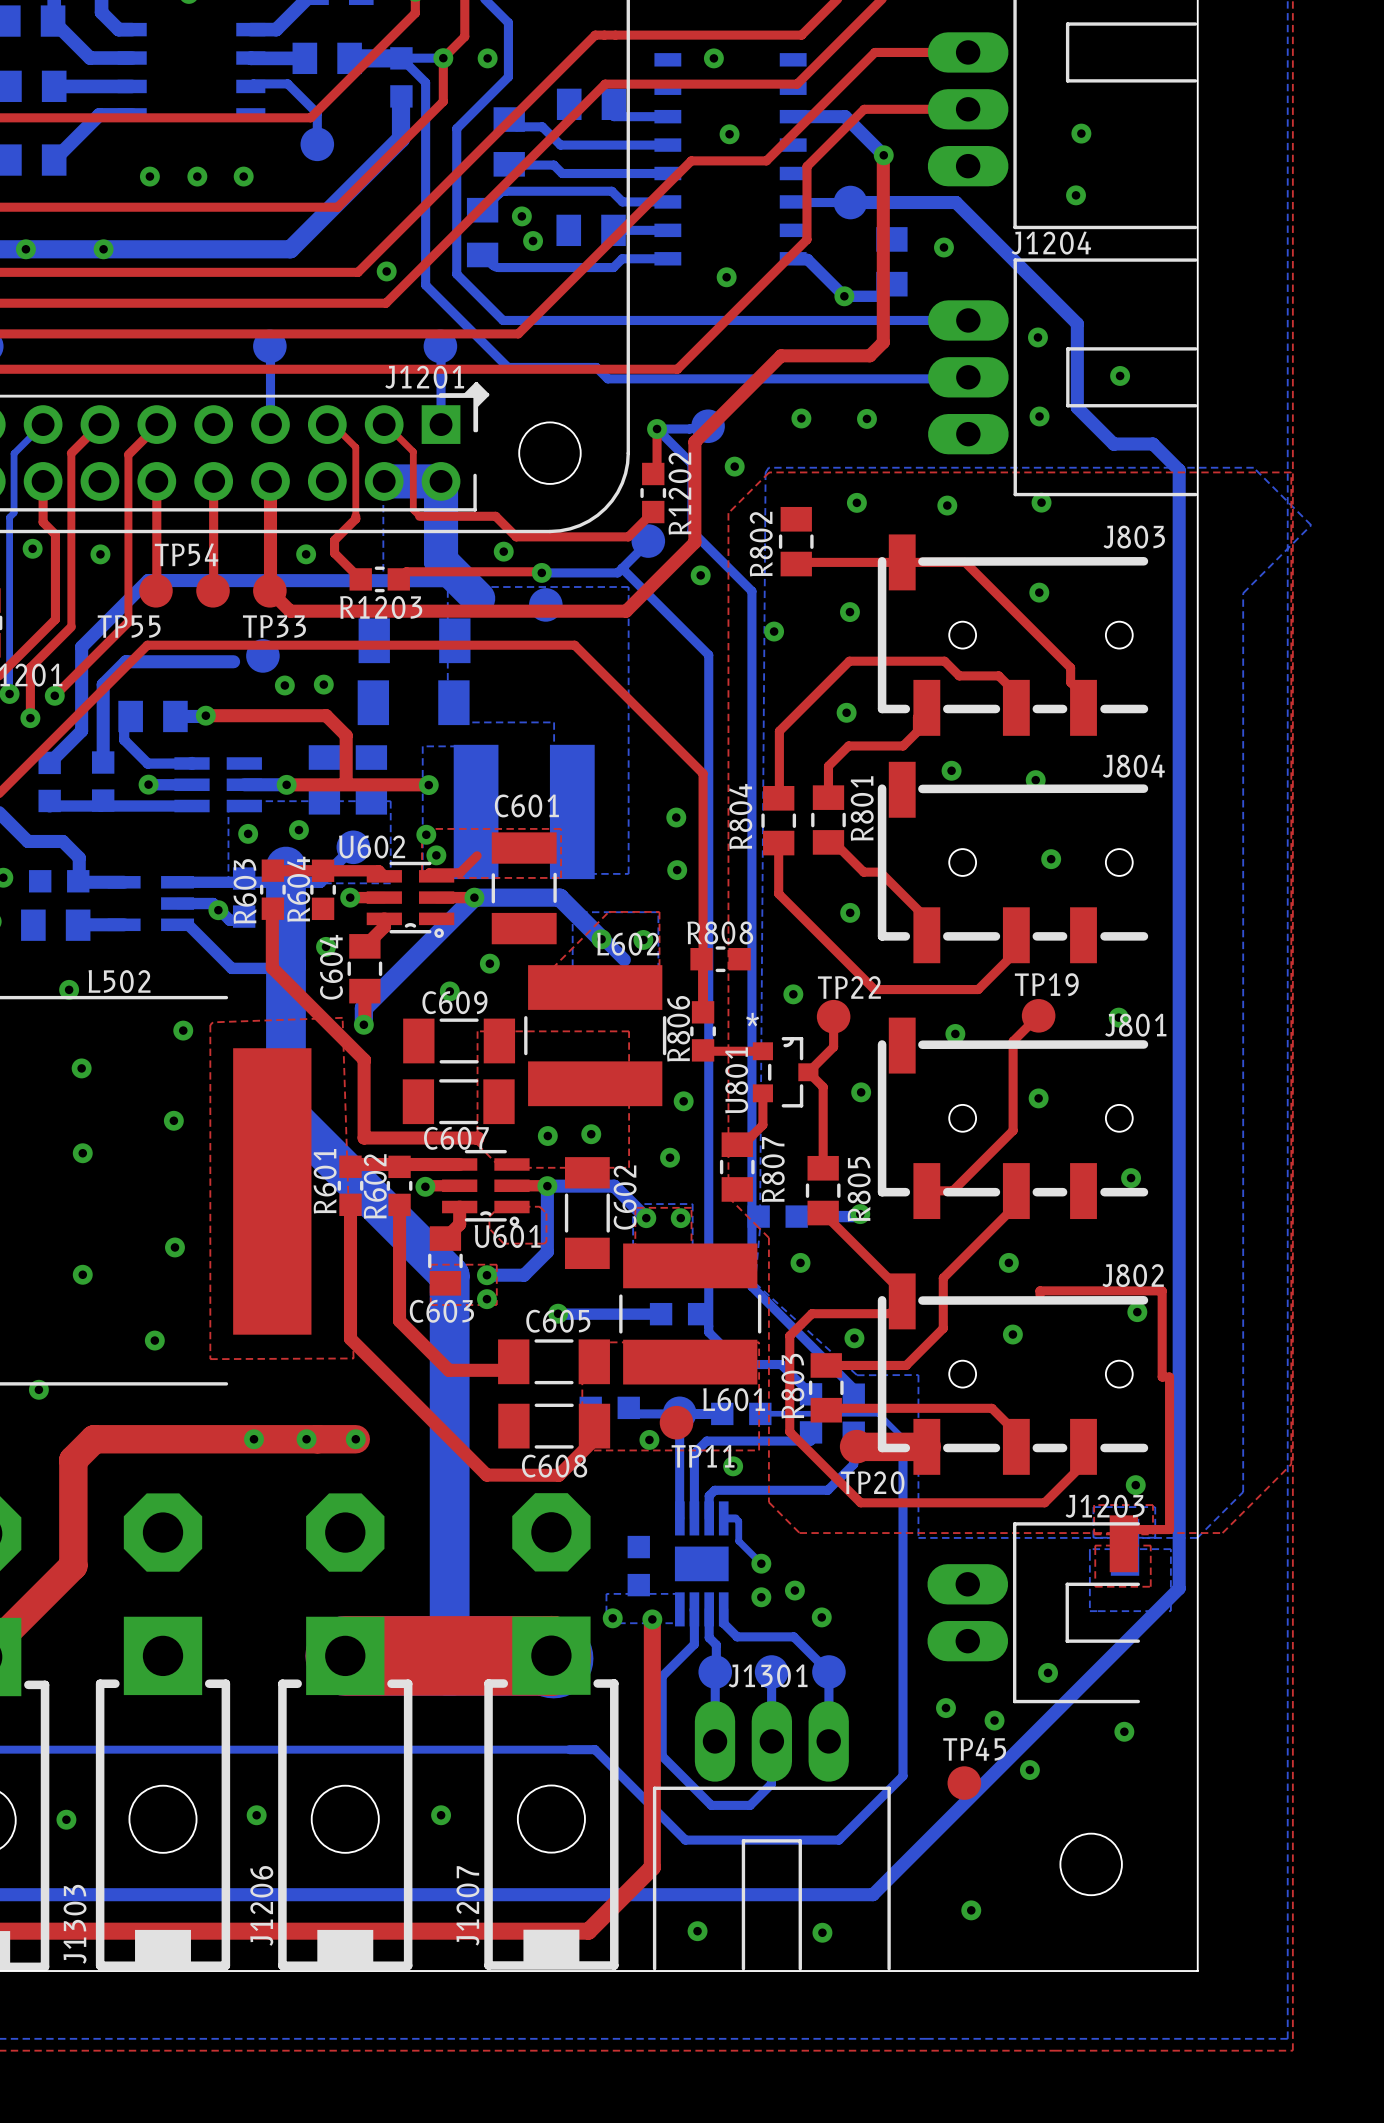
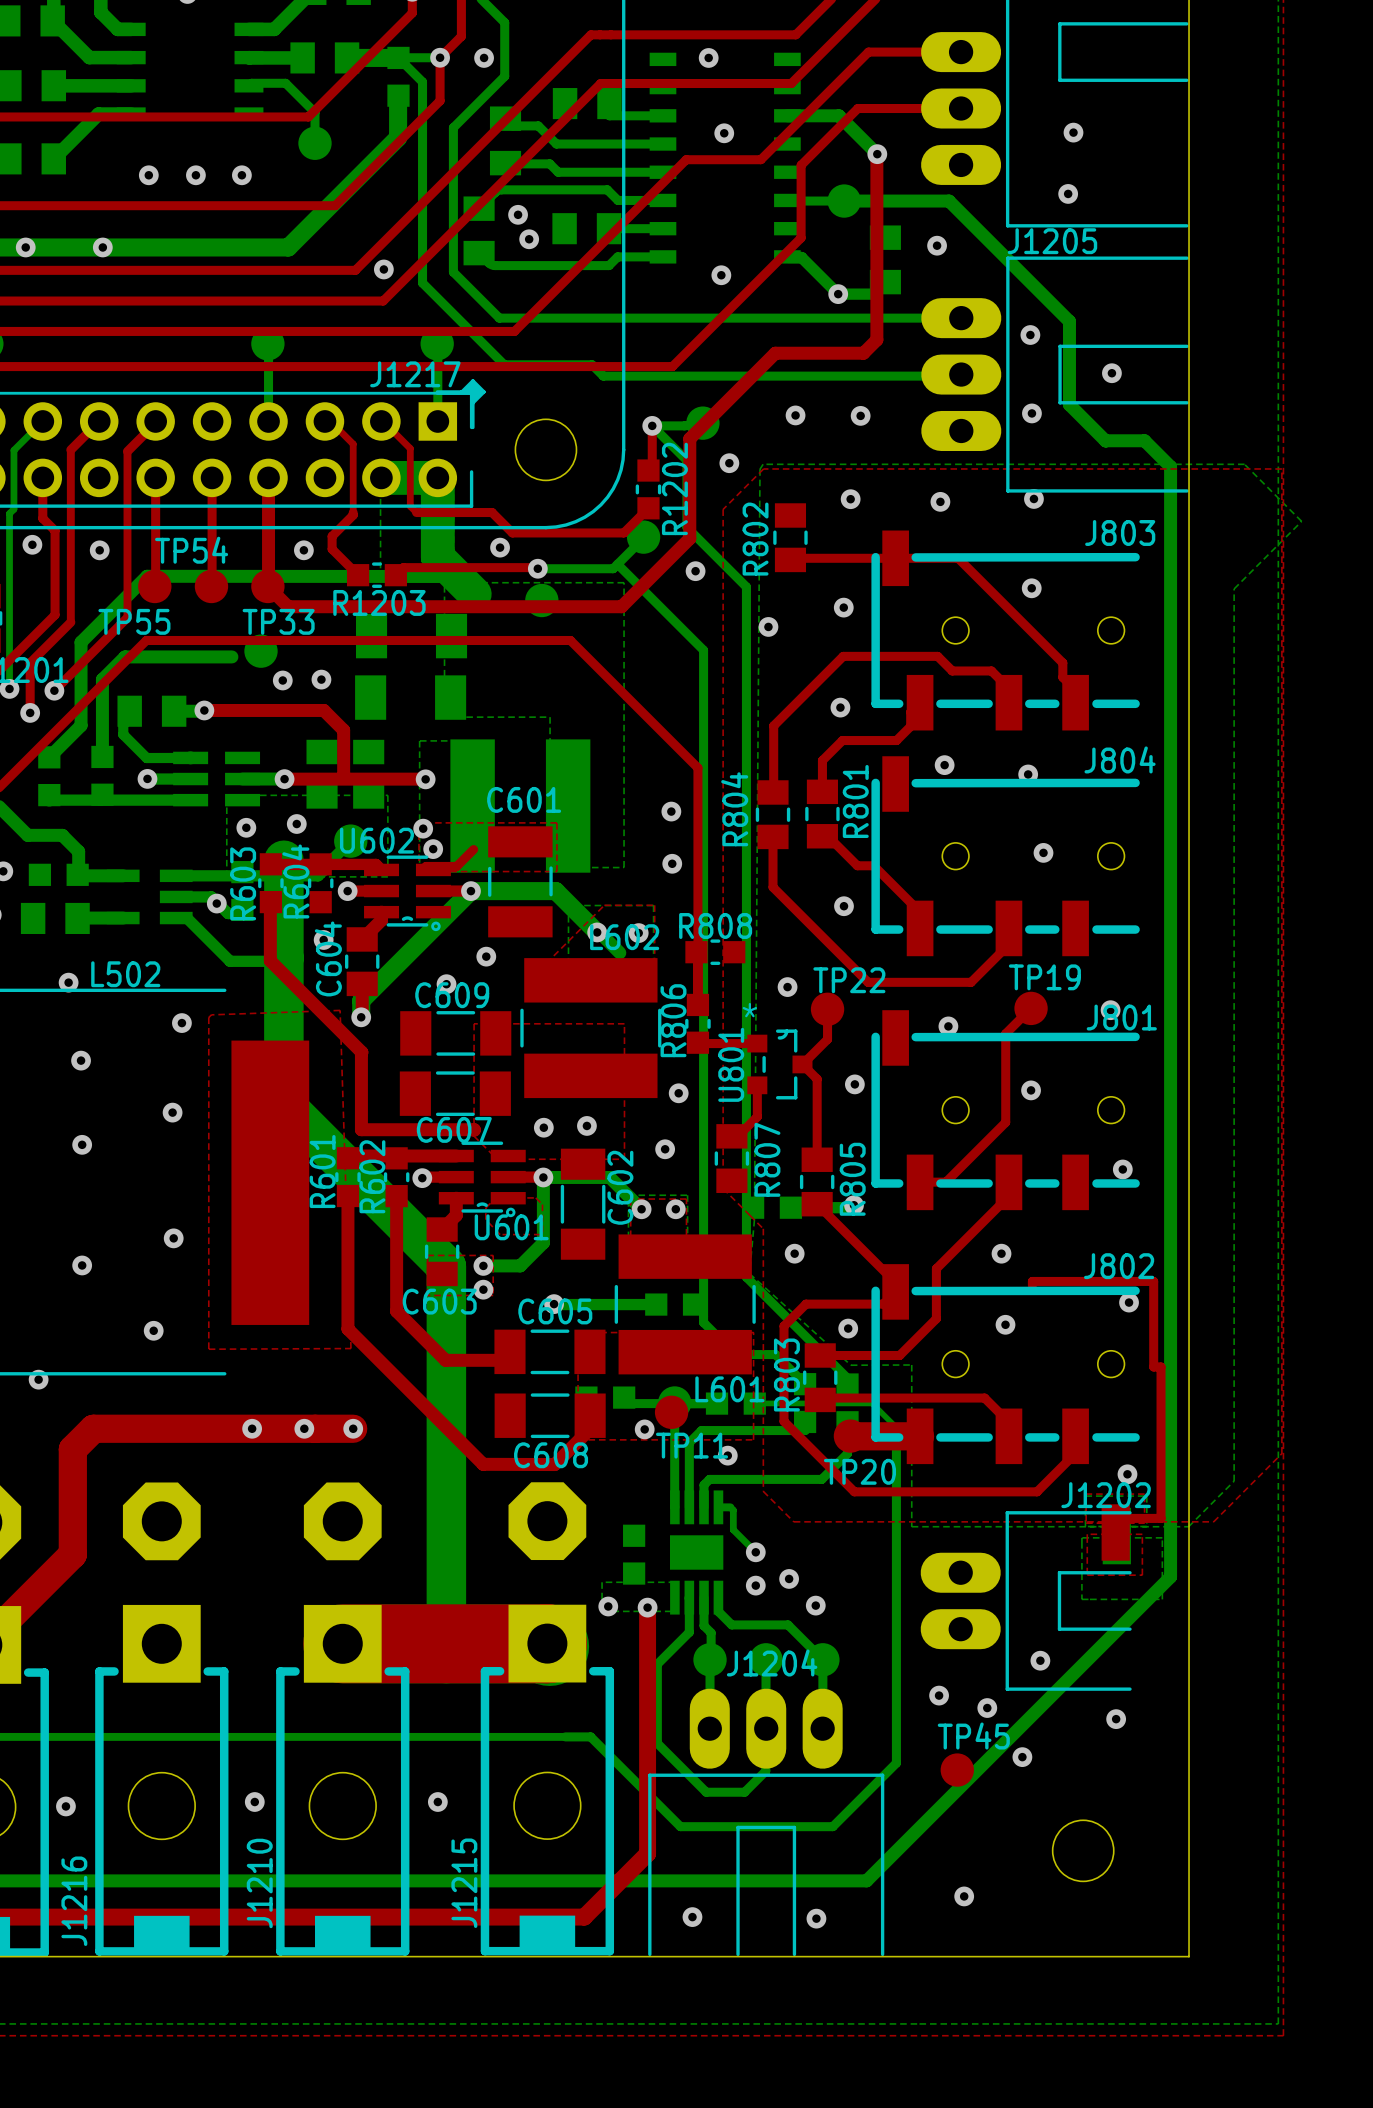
J1204 name: J1204 (1051, 243) -> J1205 (1052, 241)
J1201 name: J1201 (424, 377) -> J1217 (415, 374)
J1203 name: J1203 (1105, 1506) -> J1202 (1106, 1495)
J1301 name: J1301 (768, 1675) -> J1204 (772, 1662)
J1206 name: J1206 (261, 1905) -> J1210 (259, 1883)
J1207 name: J1207 (467, 1905) -> J1215 (464, 1883)
J1303 name: J1303 (75, 1924) -> J1216 (74, 1901)

